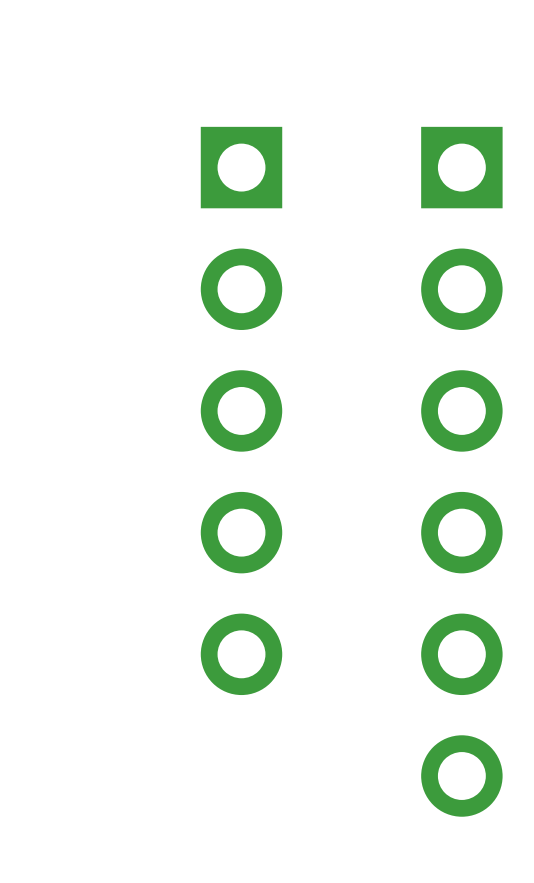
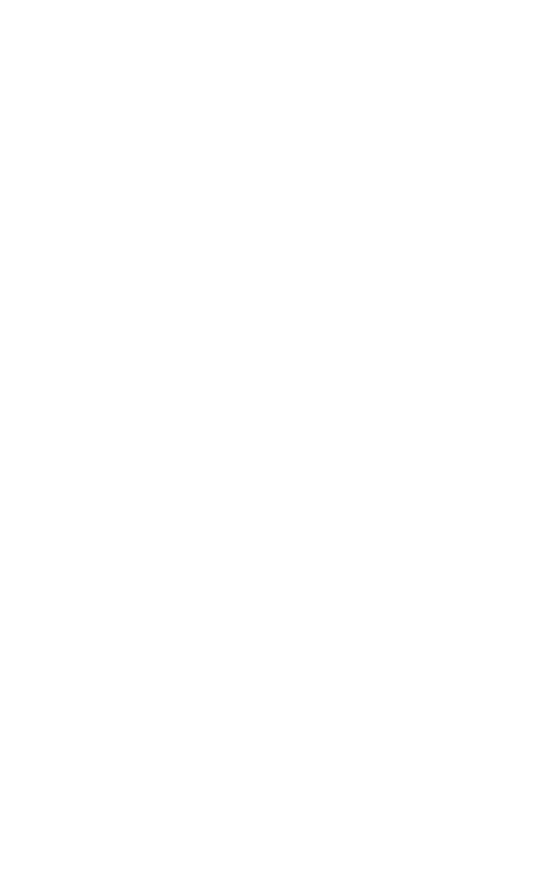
part: (241, 410) -> none
part: (461, 471) -> none

